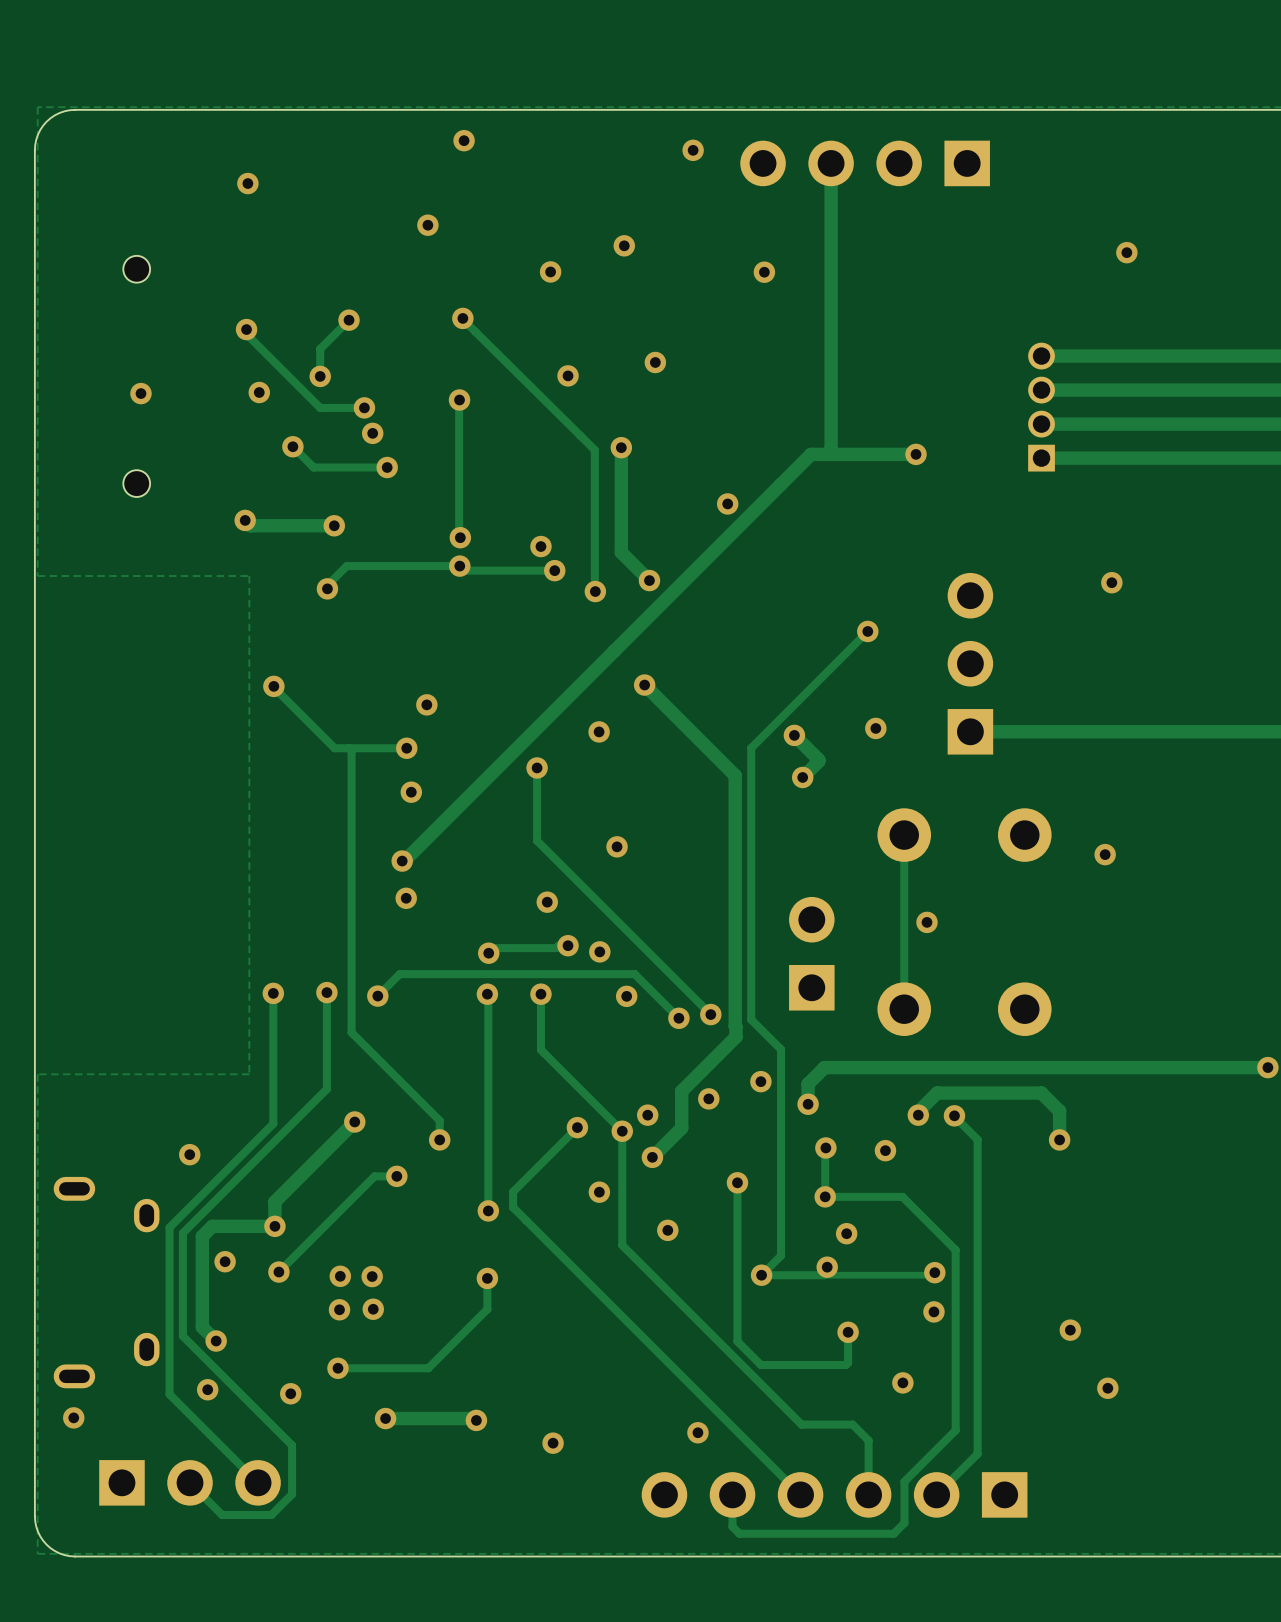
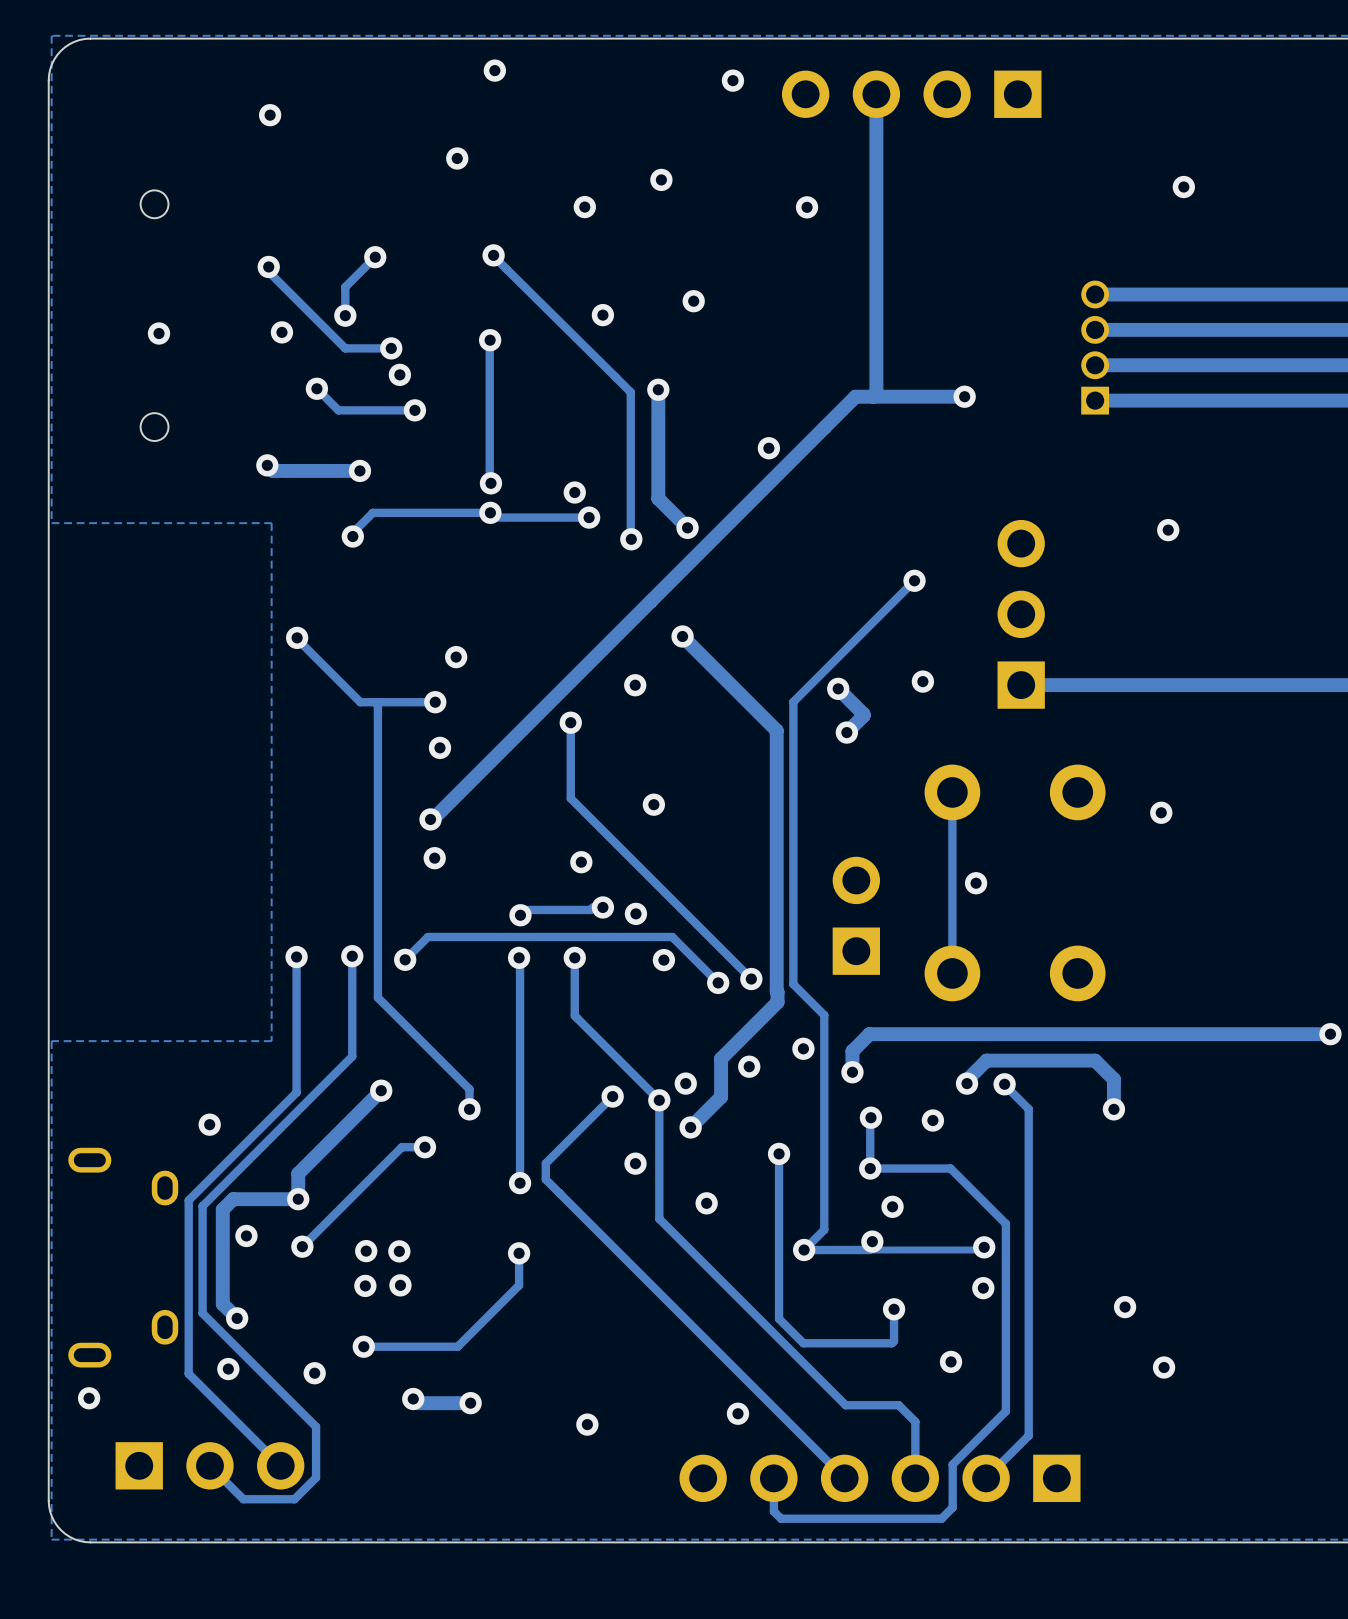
track: (385, 1418) (474, 1418) (476, 1420) -> (413, 1398) (417, 1403) (470, 1403)
via position: (476, 1420) -> (470, 1403)

